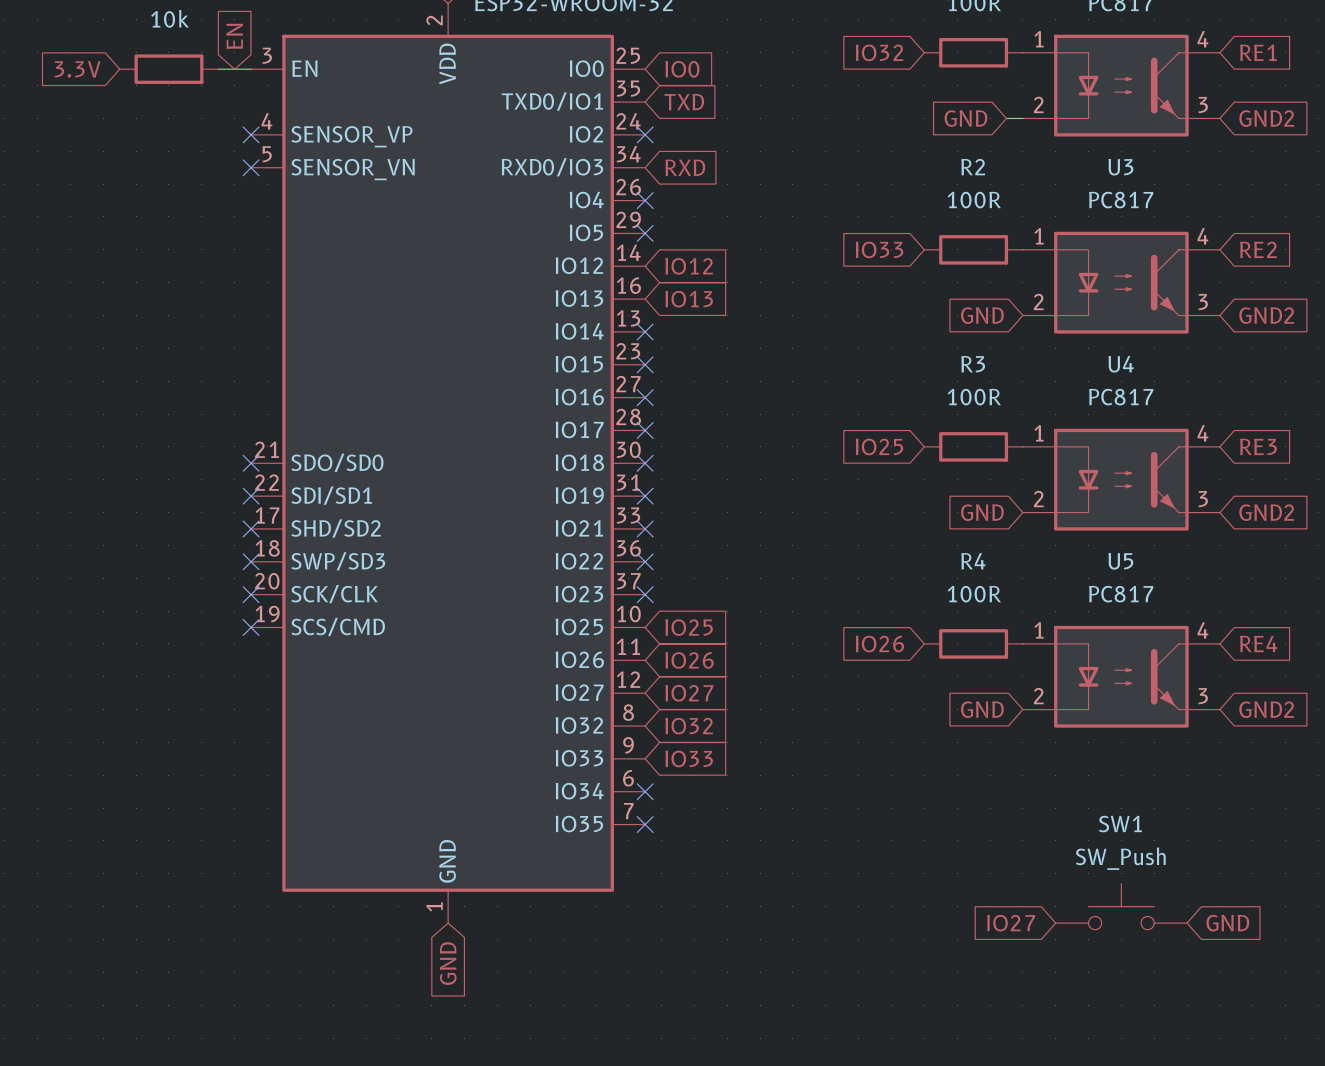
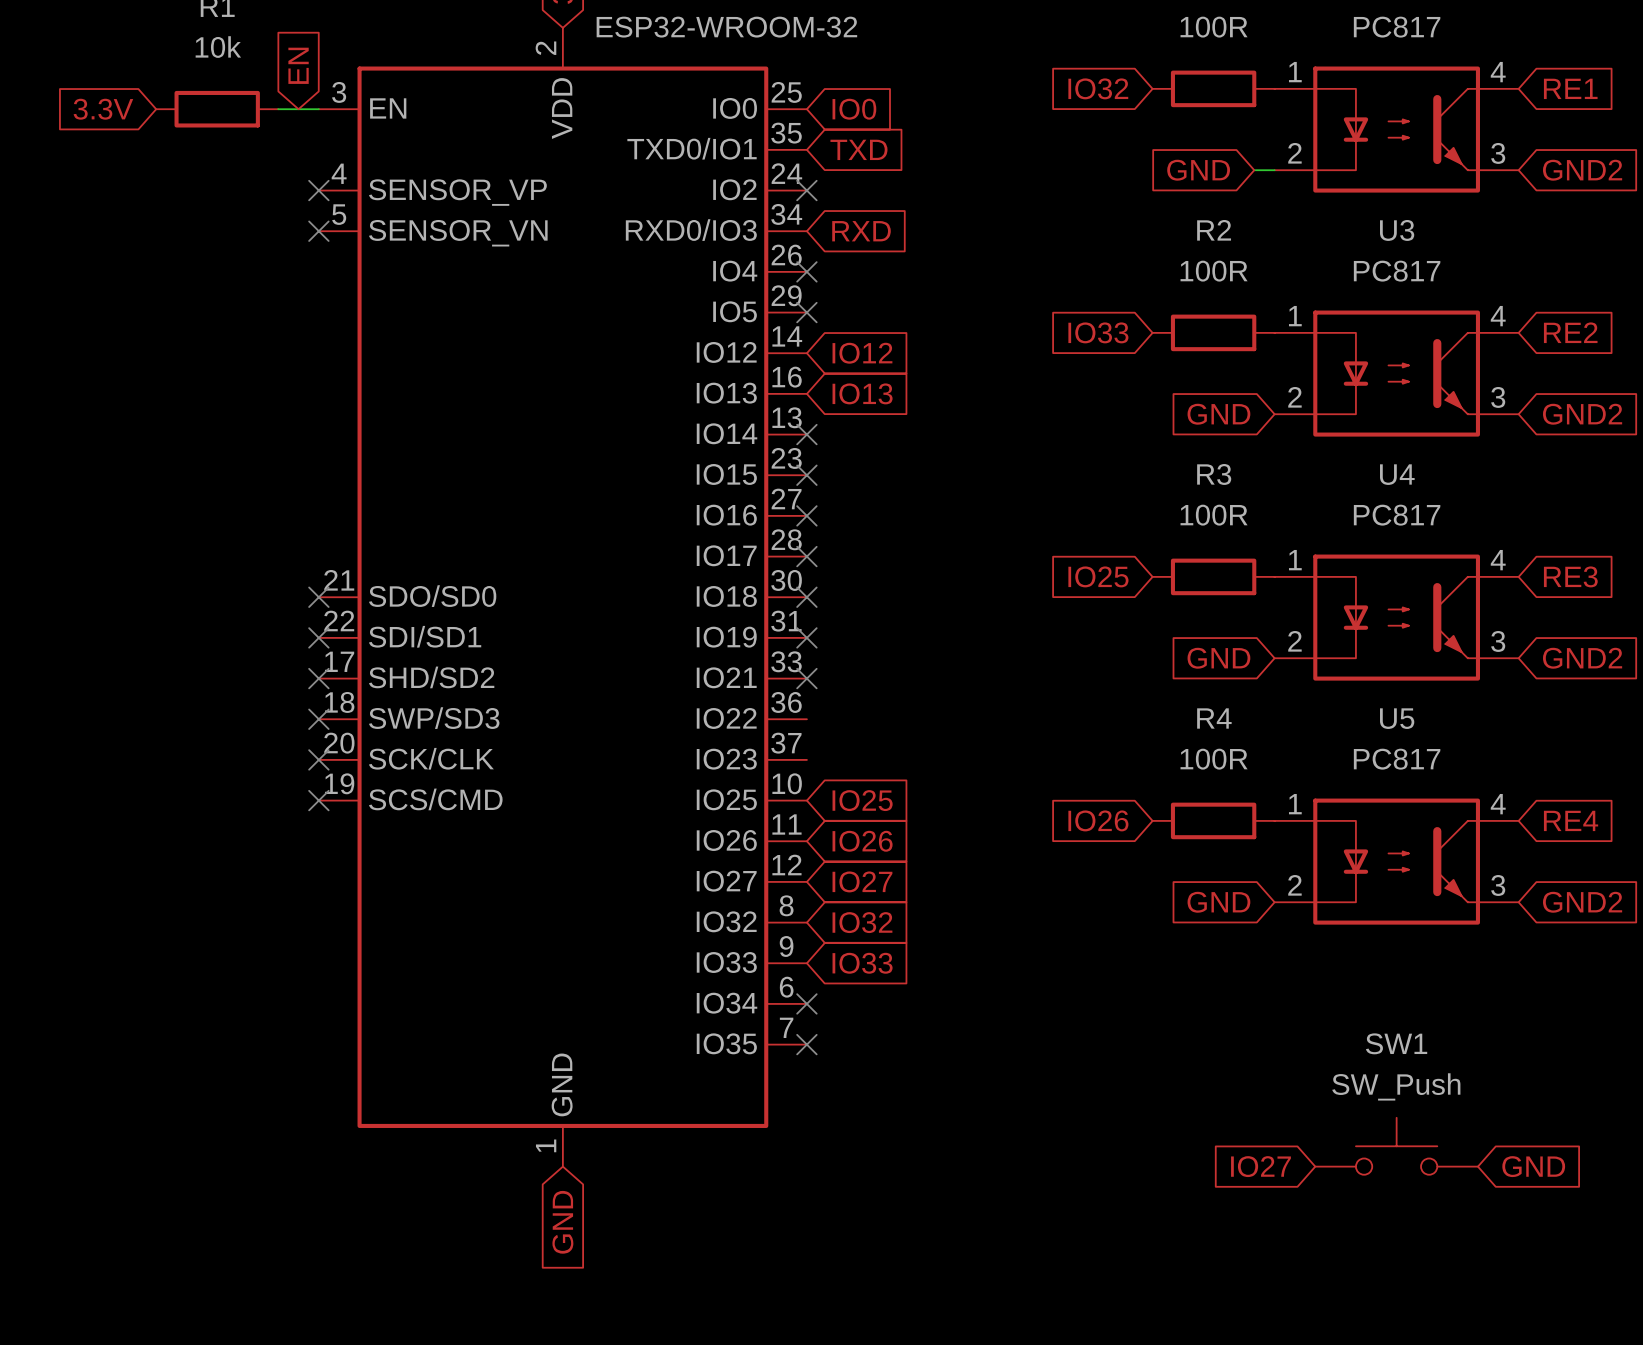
no-connect mark: (645, 561) -> none
no-connect mark: (645, 594) -> none

